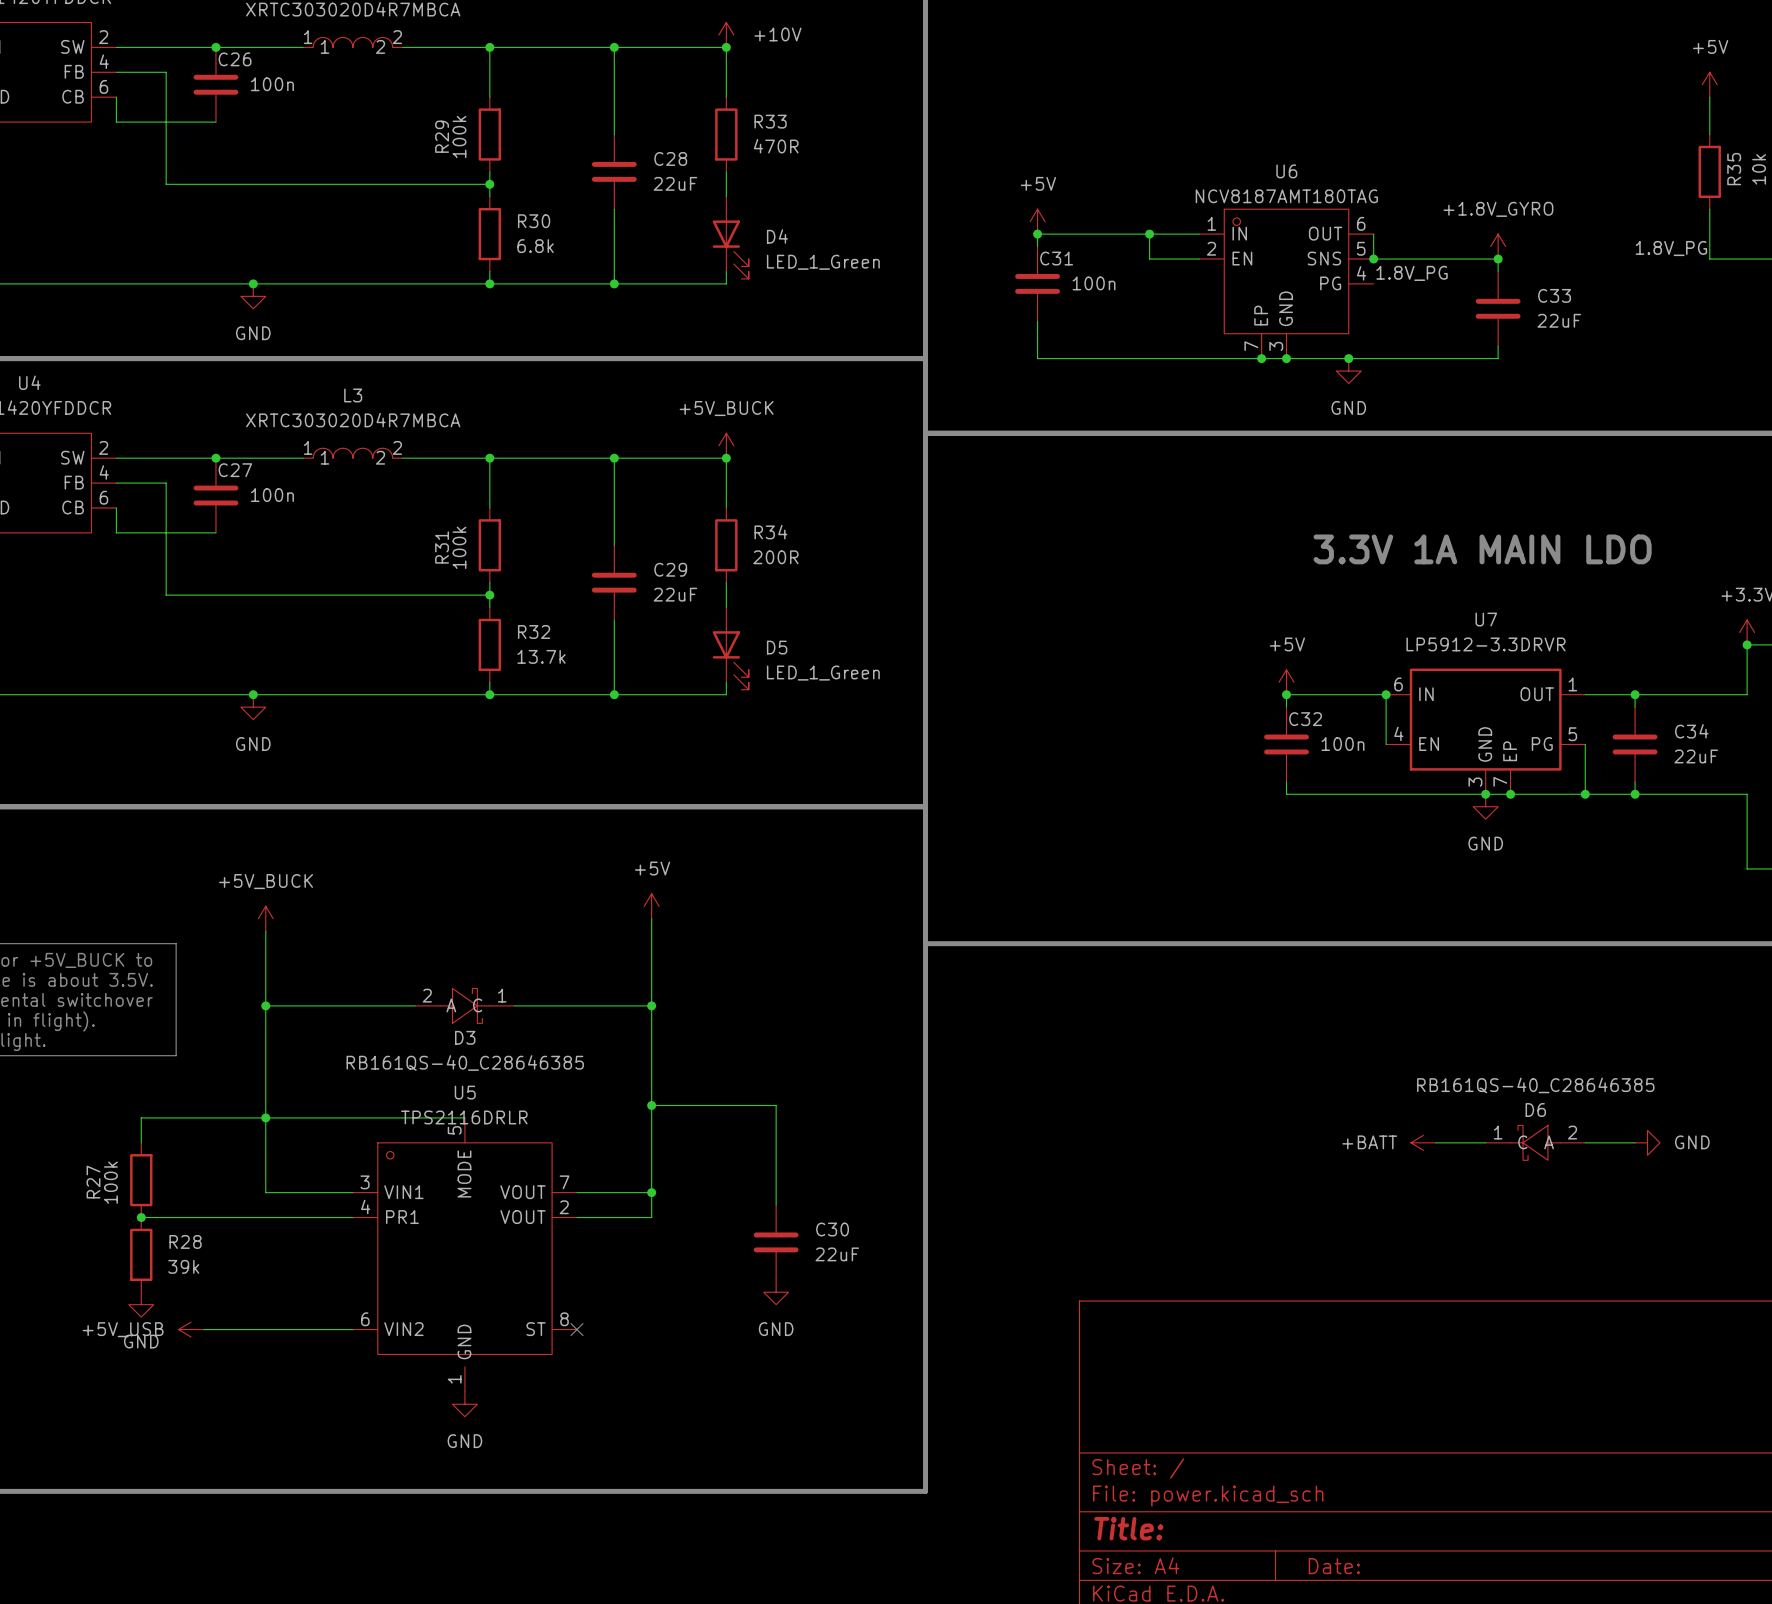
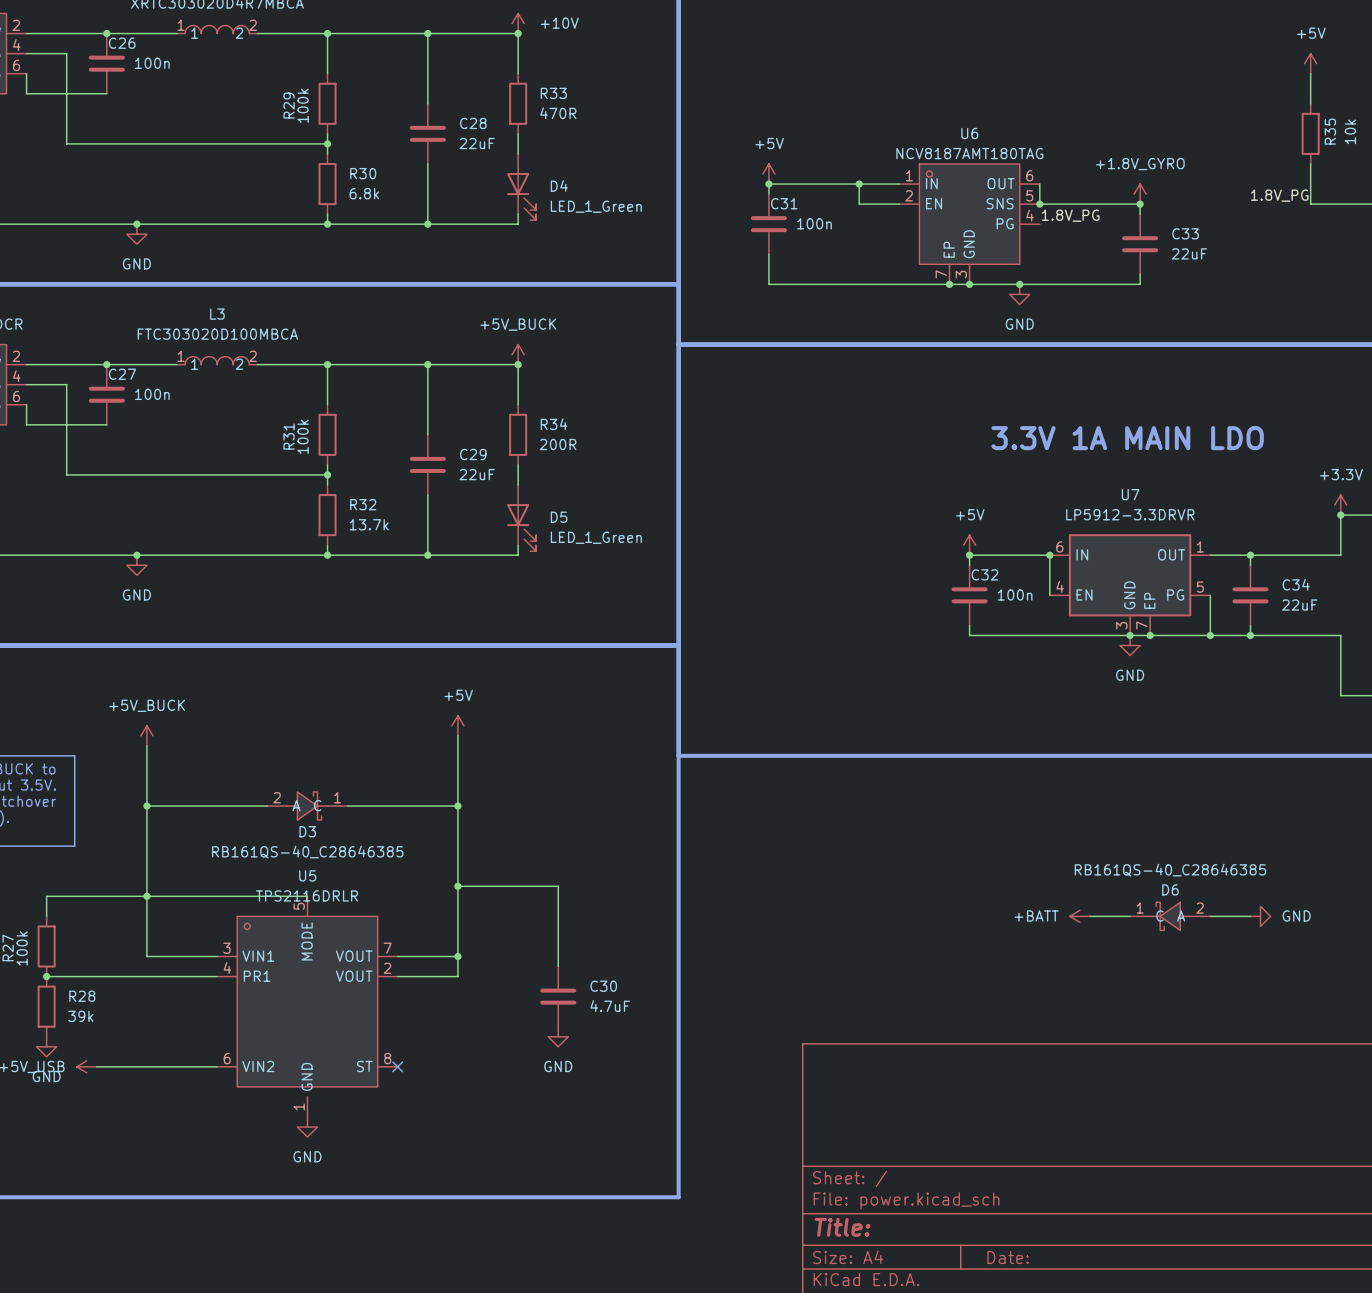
L3 value: XRTC303020D4R7MBCA (353, 420) -> FTC303020D100MBCA (217, 334)
C30 value: 22uF (837, 1254) -> 4.7uF (610, 1006)

